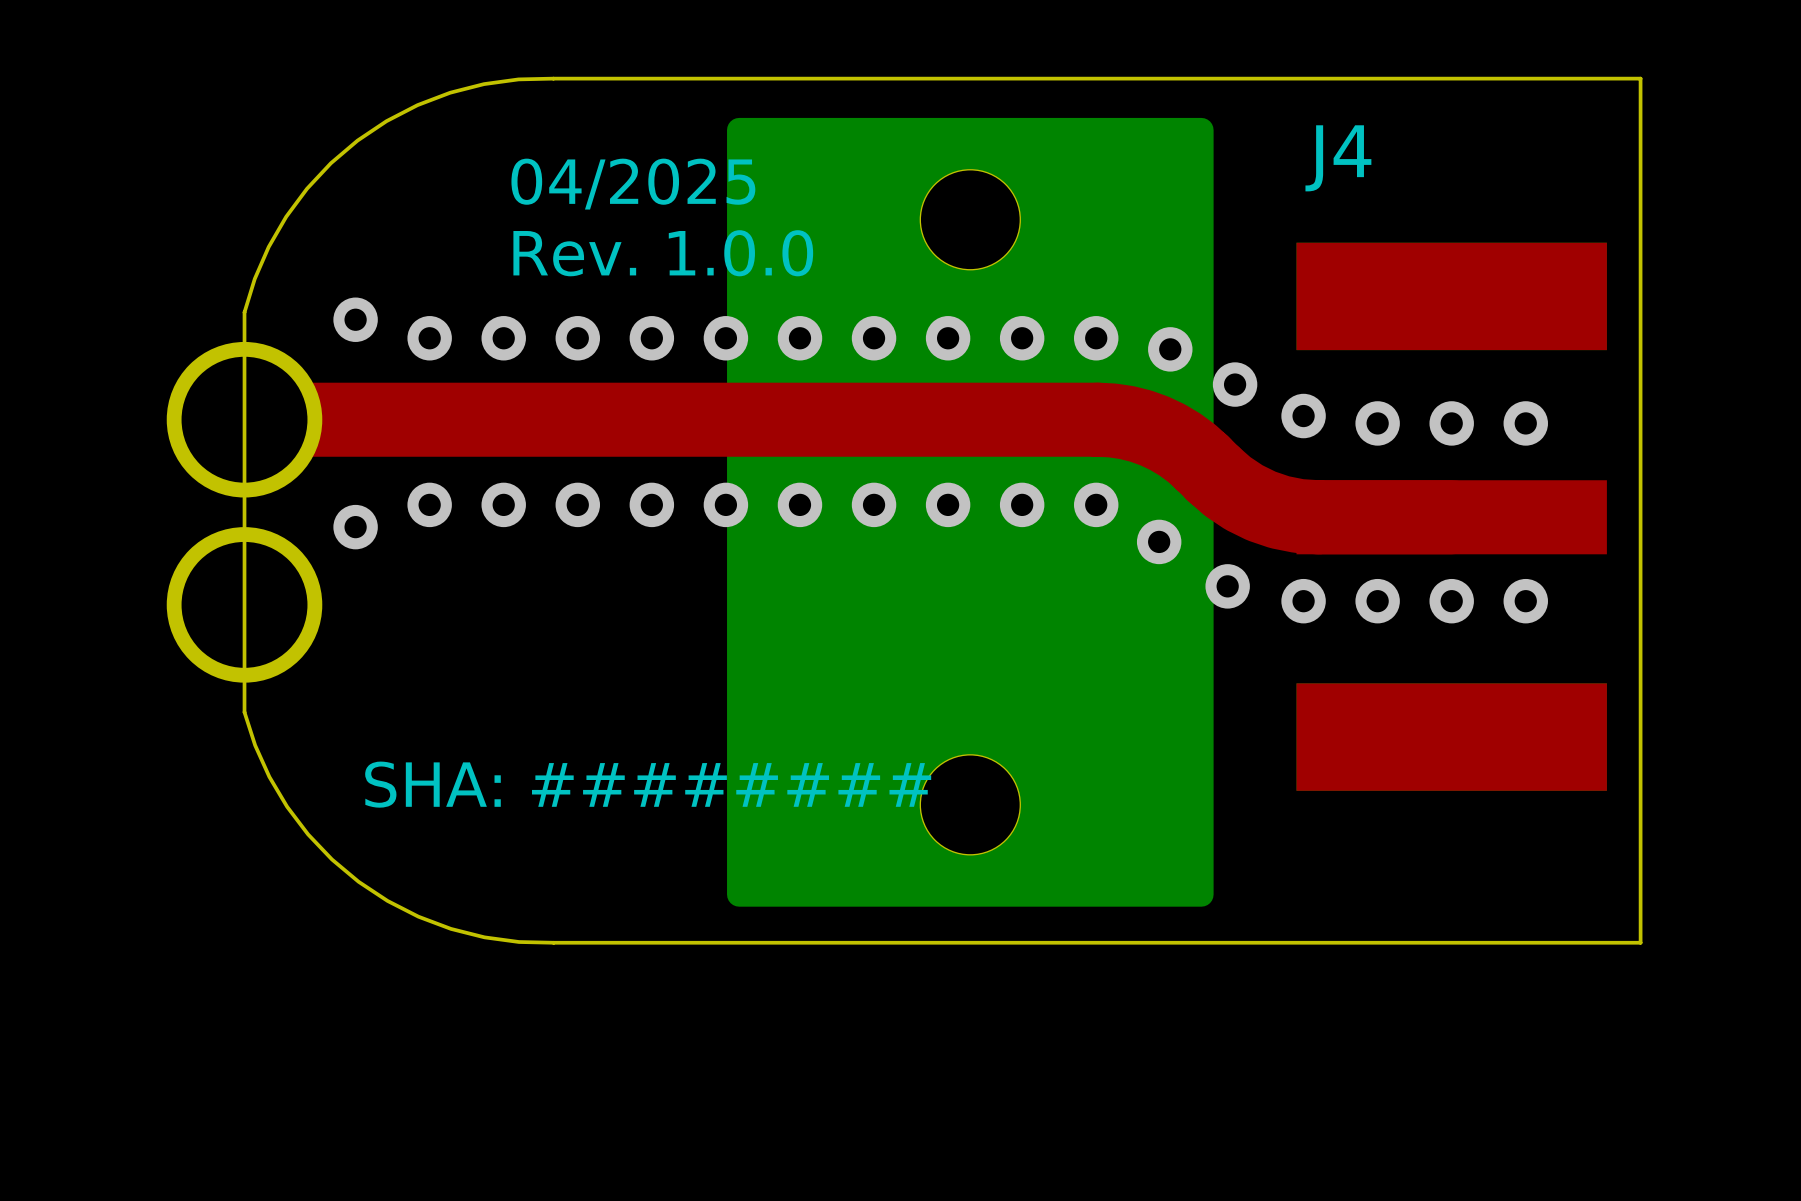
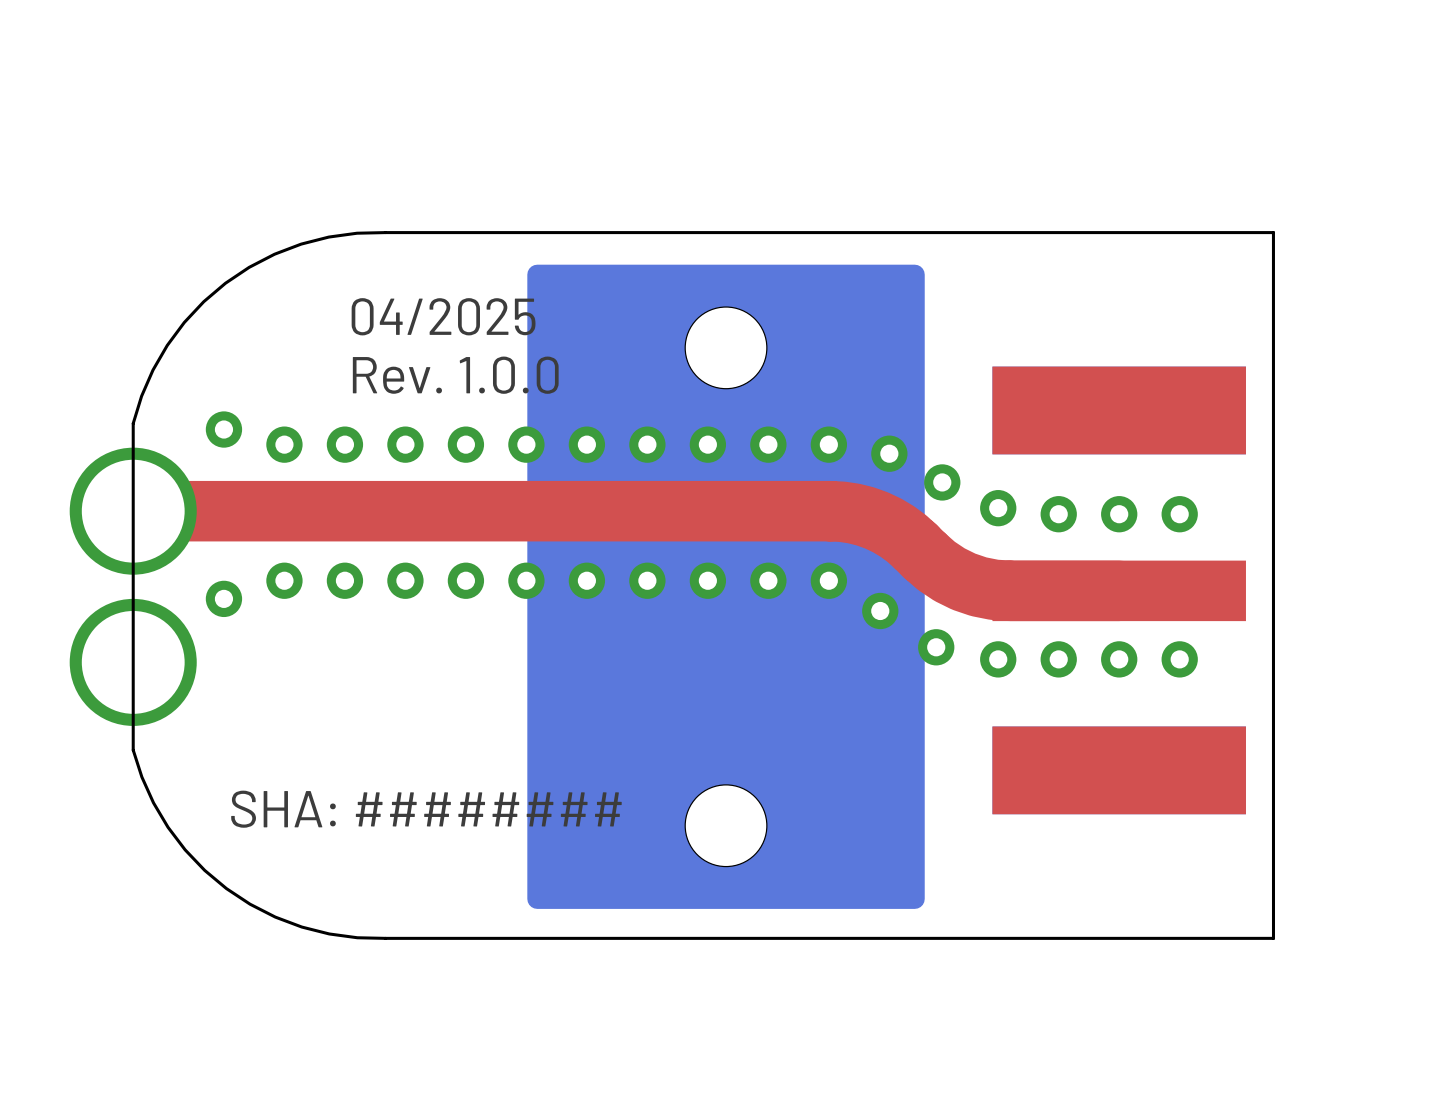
J4 name: J4 (1338, 158) -> none

